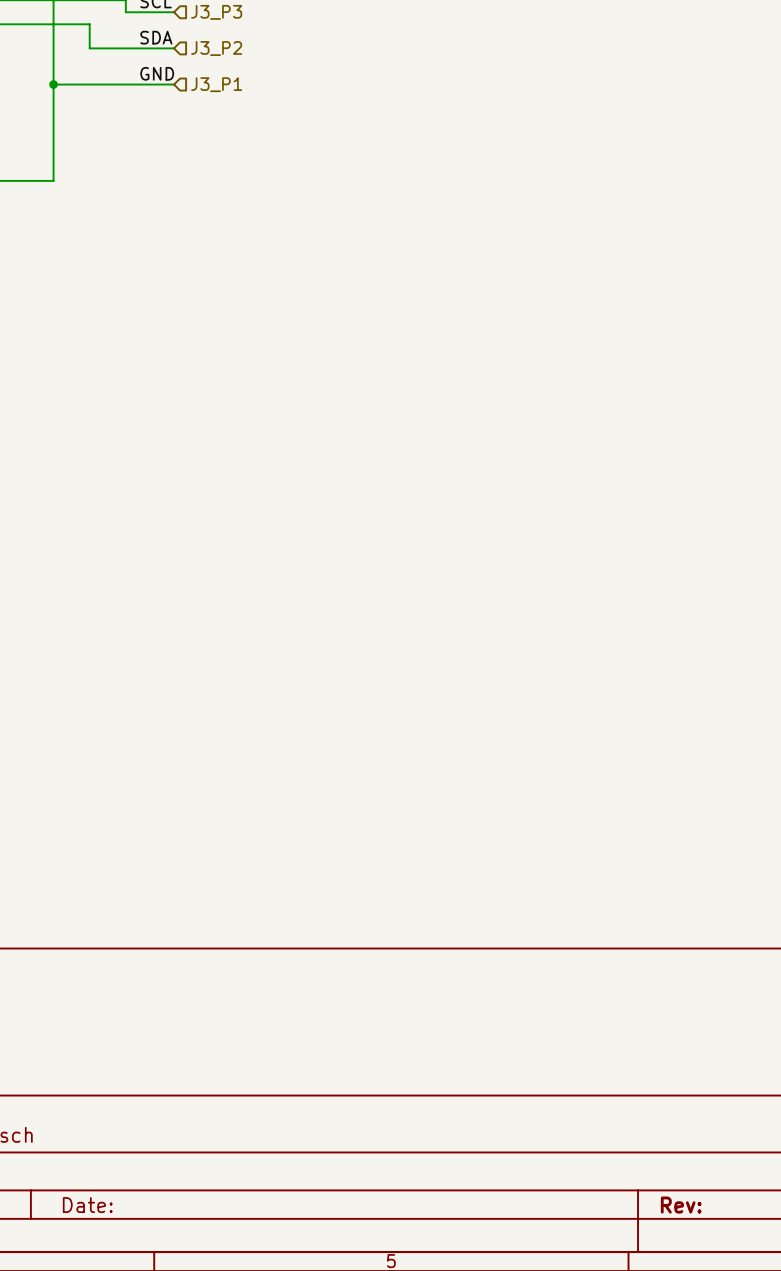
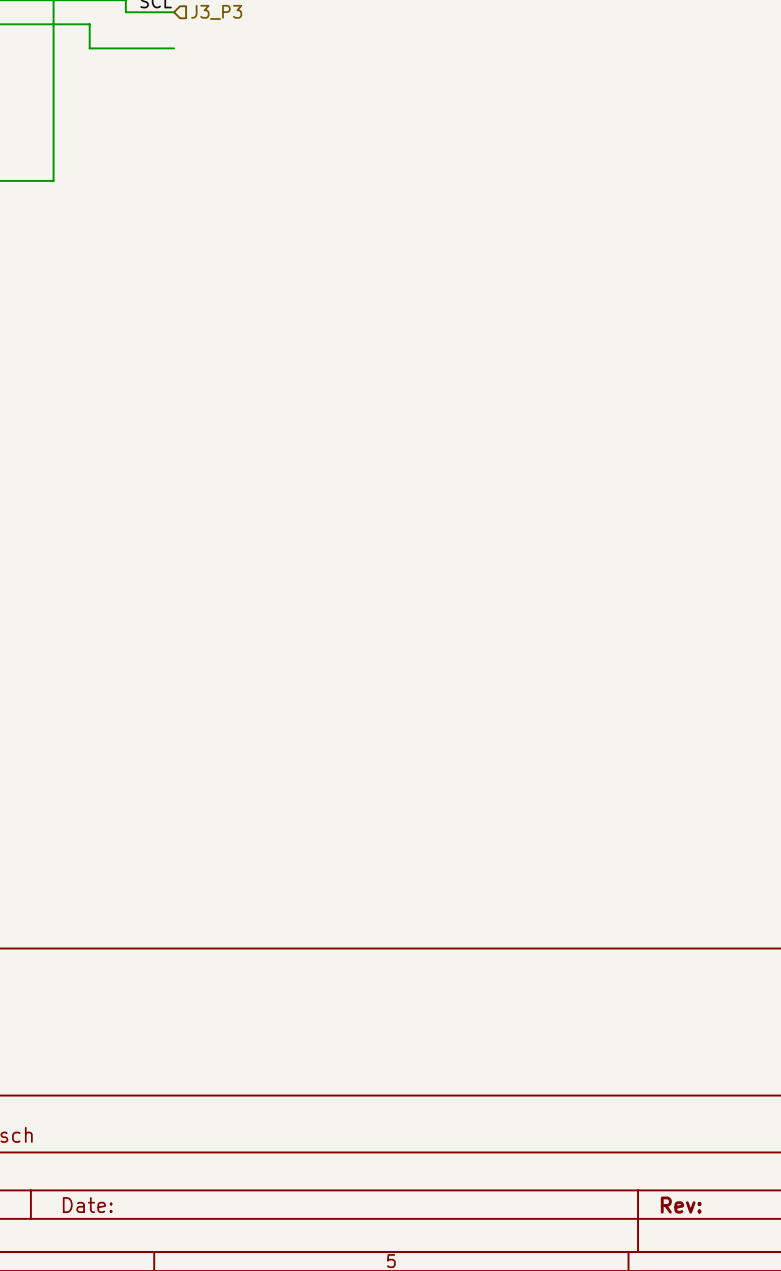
label: SDA (156, 37) -> none
hierarchical label: J3_P2 (216, 48) -> none
label: GND (157, 73) -> none
wire: (53, 84) (174, 84) -> none
junction: (53, 84) -> none
hierarchical label: J3_P1 (216, 84) -> none

